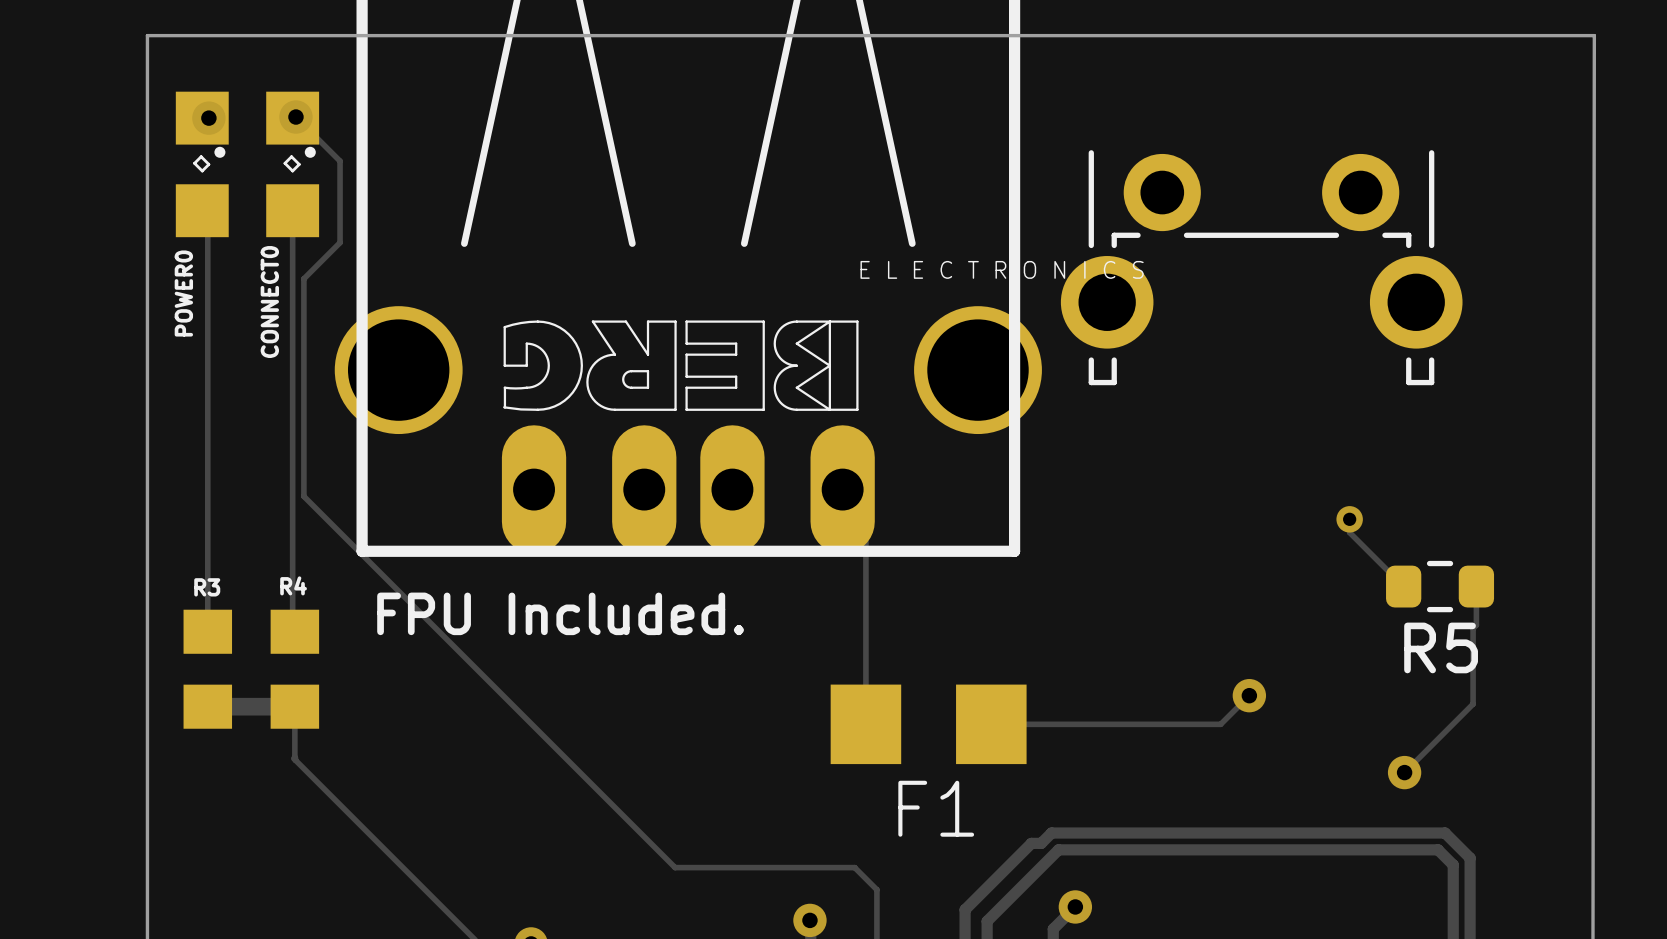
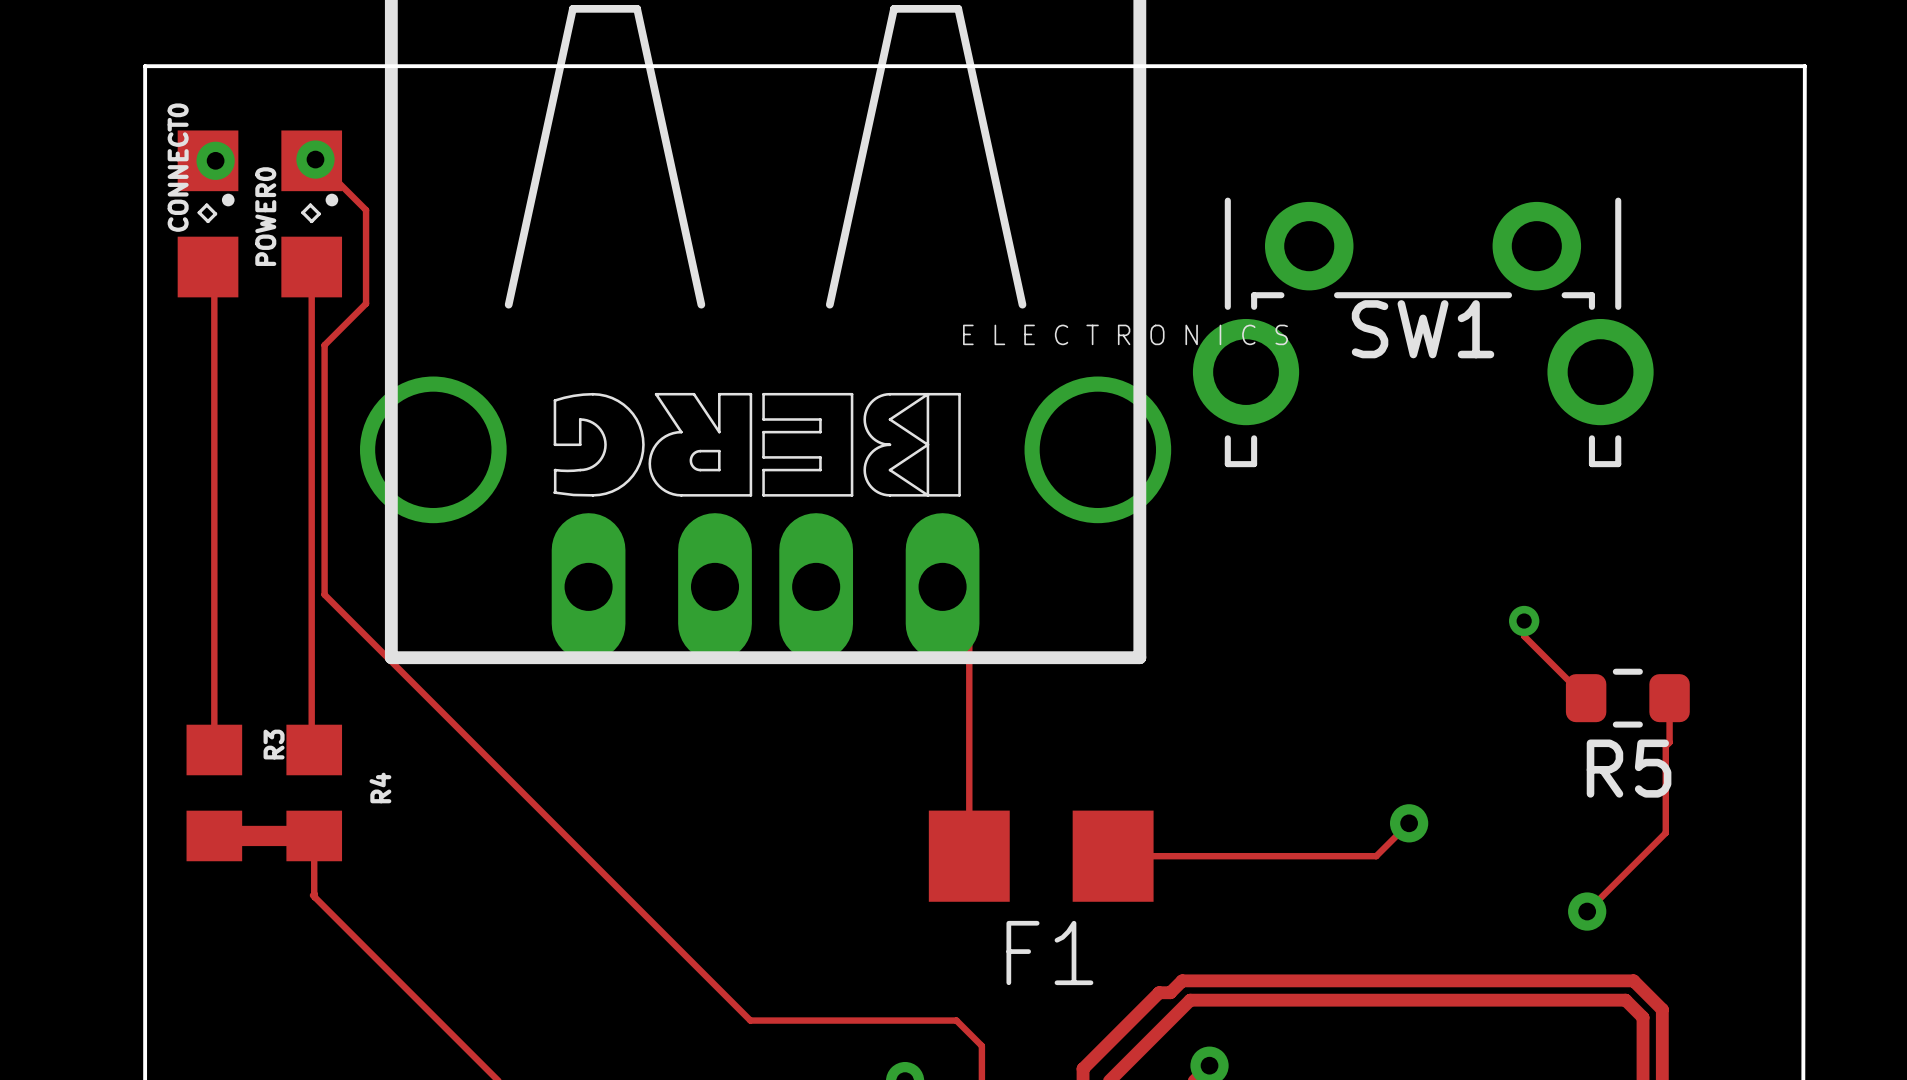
SW1 name: none -> SW1 (1423, 329)
POWER0 name position: POWER0 (183, 293) -> POWER0 (265, 216)
CONNECT0 name position: CONNECT0 (269, 302) -> CONNECT0 (178, 167)
R4 name rotation: 0° (293, 585) -> 90° counterclockwise (380, 787)
R4 name position: R4 (293, 585) -> R4 (380, 787)
R3 name rotation: 0° (207, 587) -> 90° counterclockwise (274, 744)
R3 name position: R3 (207, 587) -> R3 (274, 744)
text: FPU Included. (560, 613) -> none

